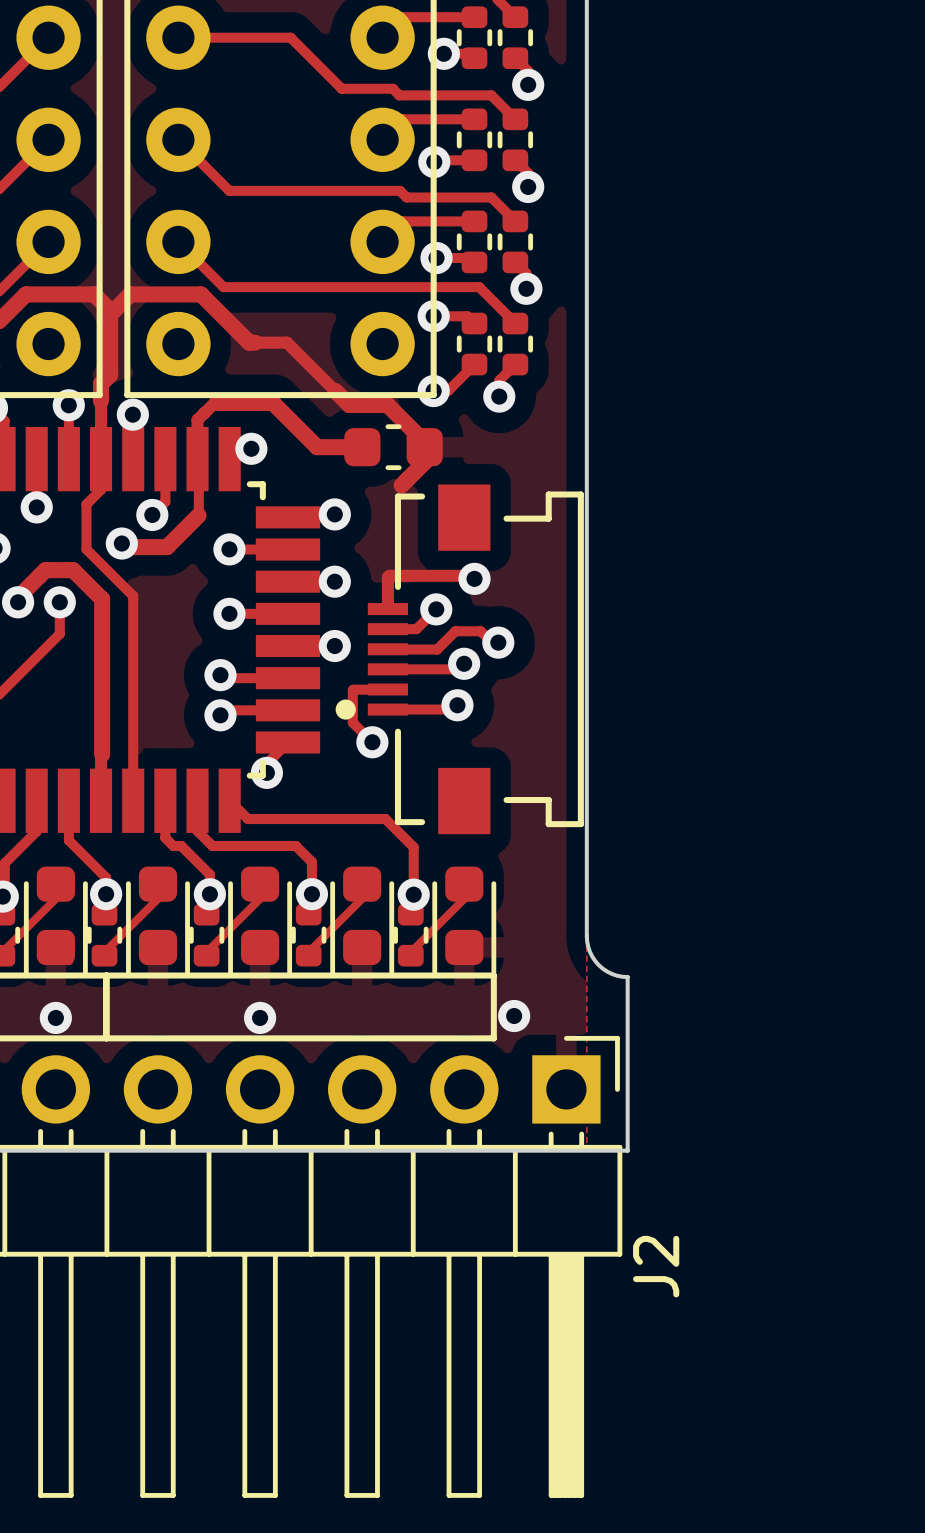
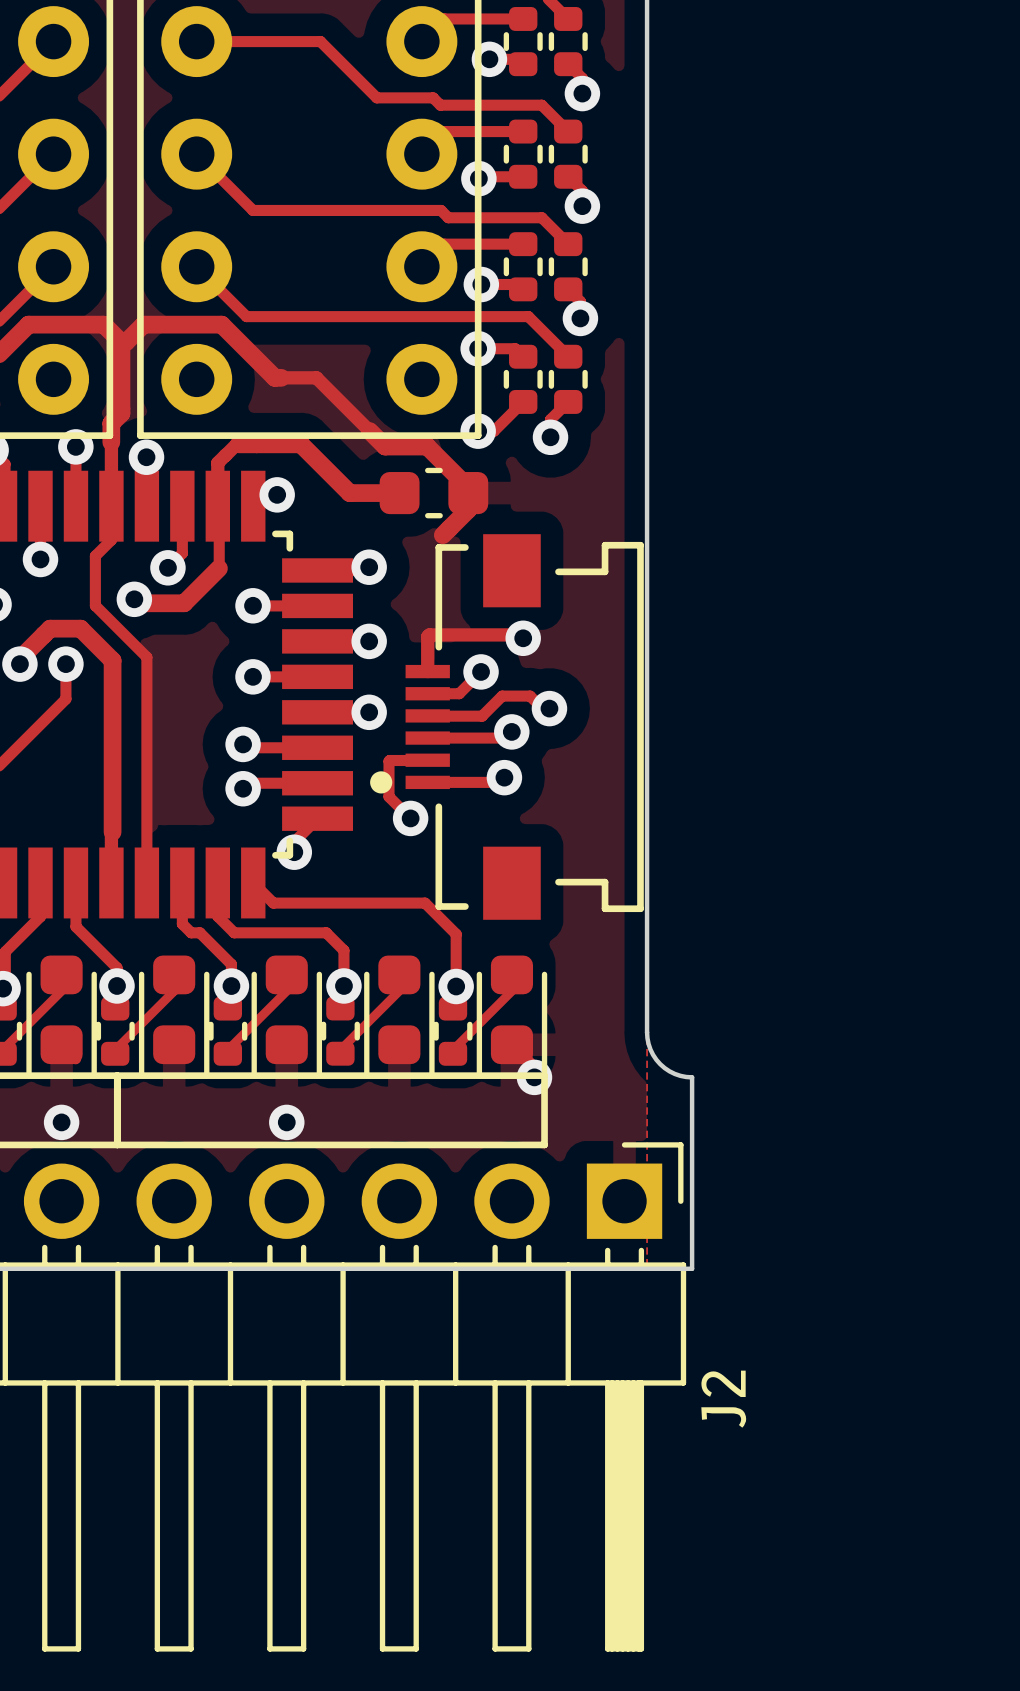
via position: (514, 1016) -> (534, 1077)

